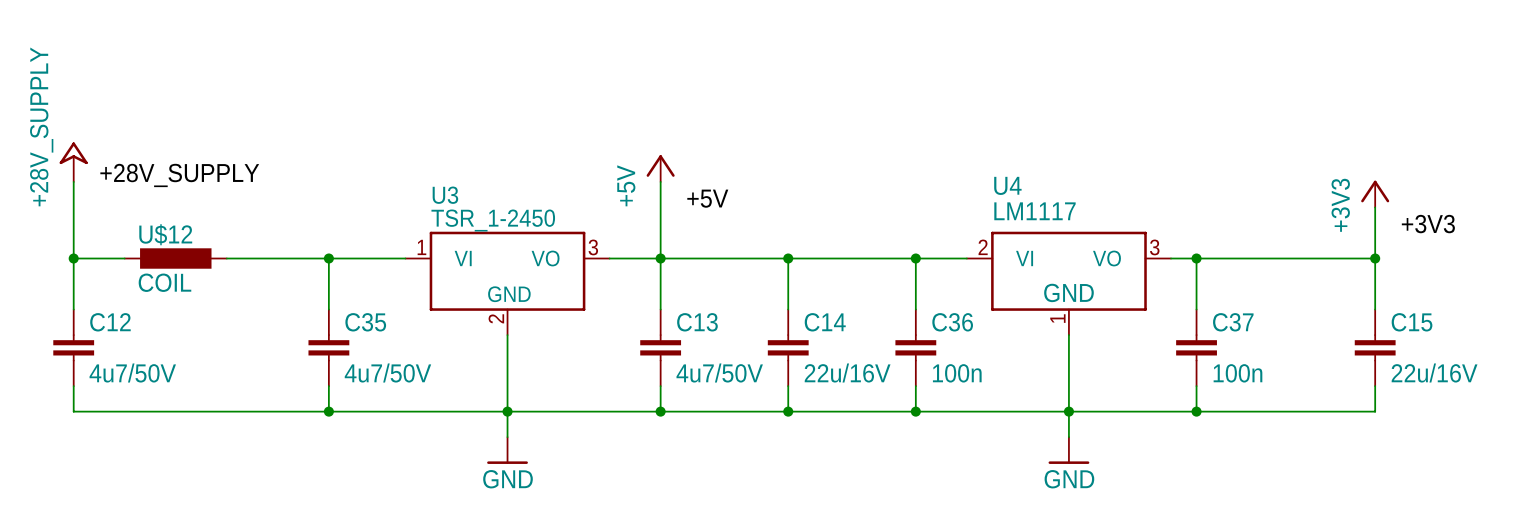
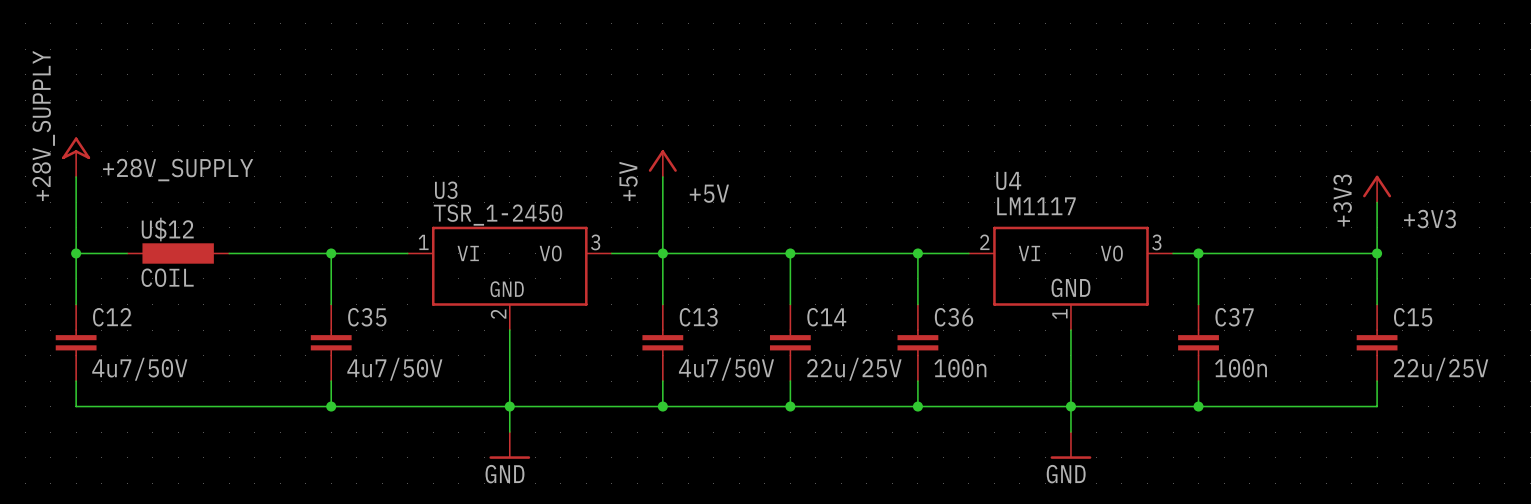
C14 value: 22u/16V (847, 372) -> 22u/25V (854, 369)
C15 value: 22u/16V (1434, 372) -> 22u/25V (1441, 369)

